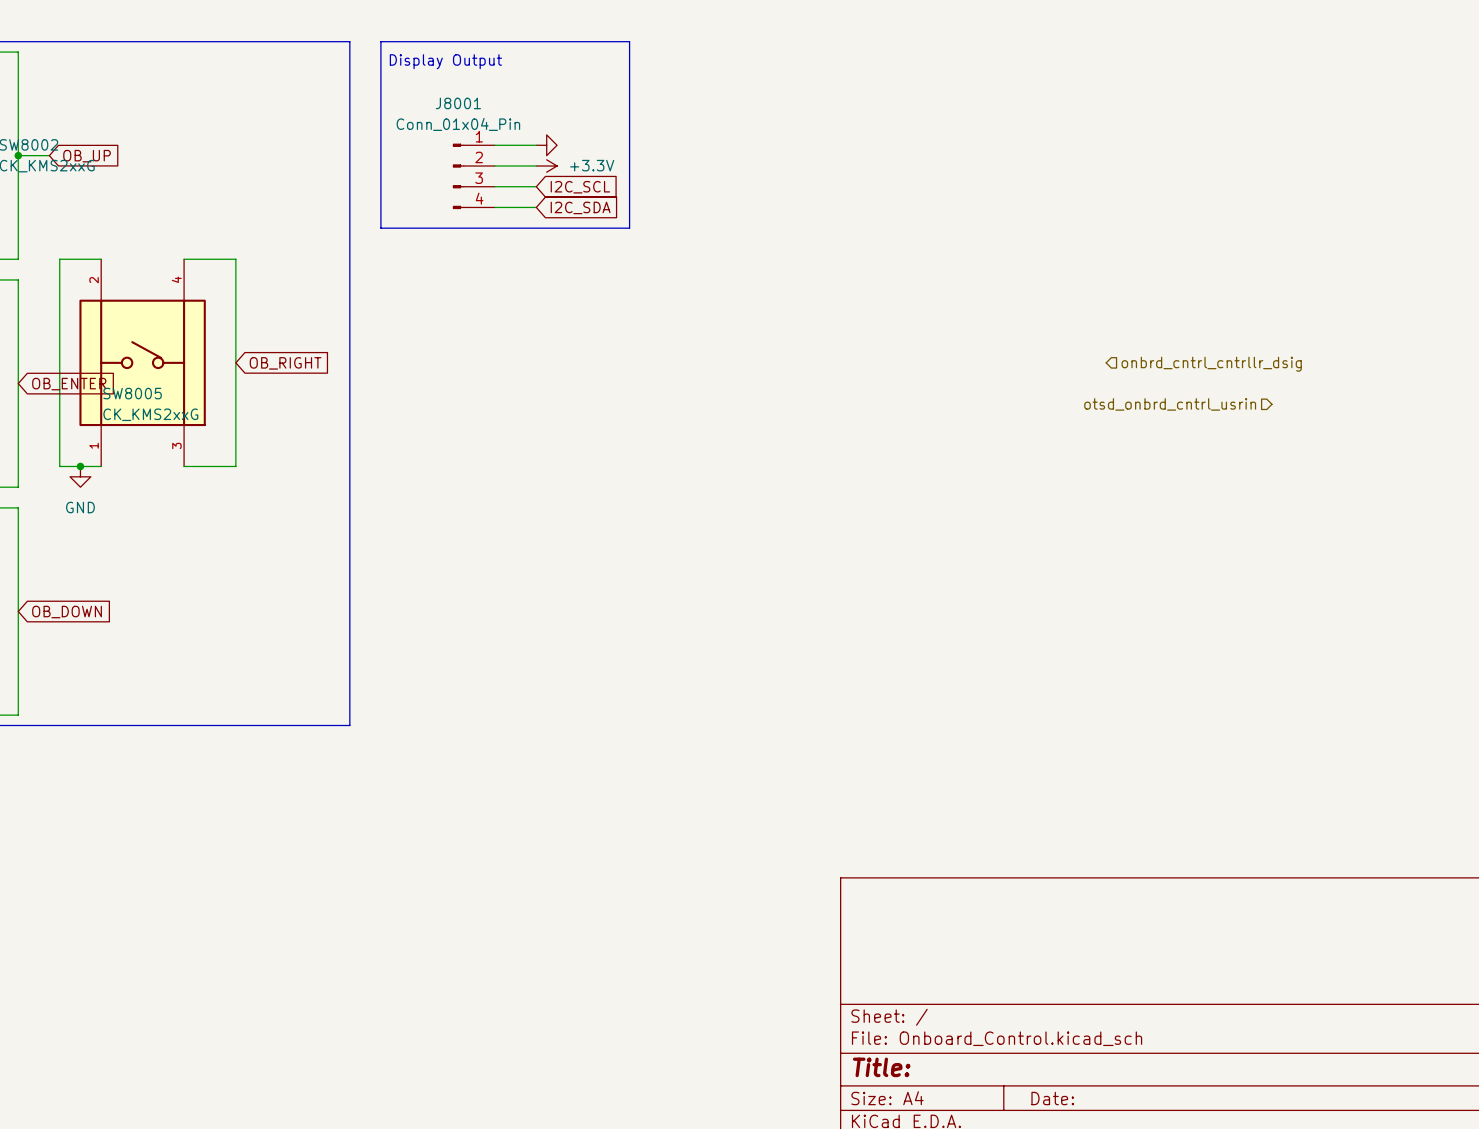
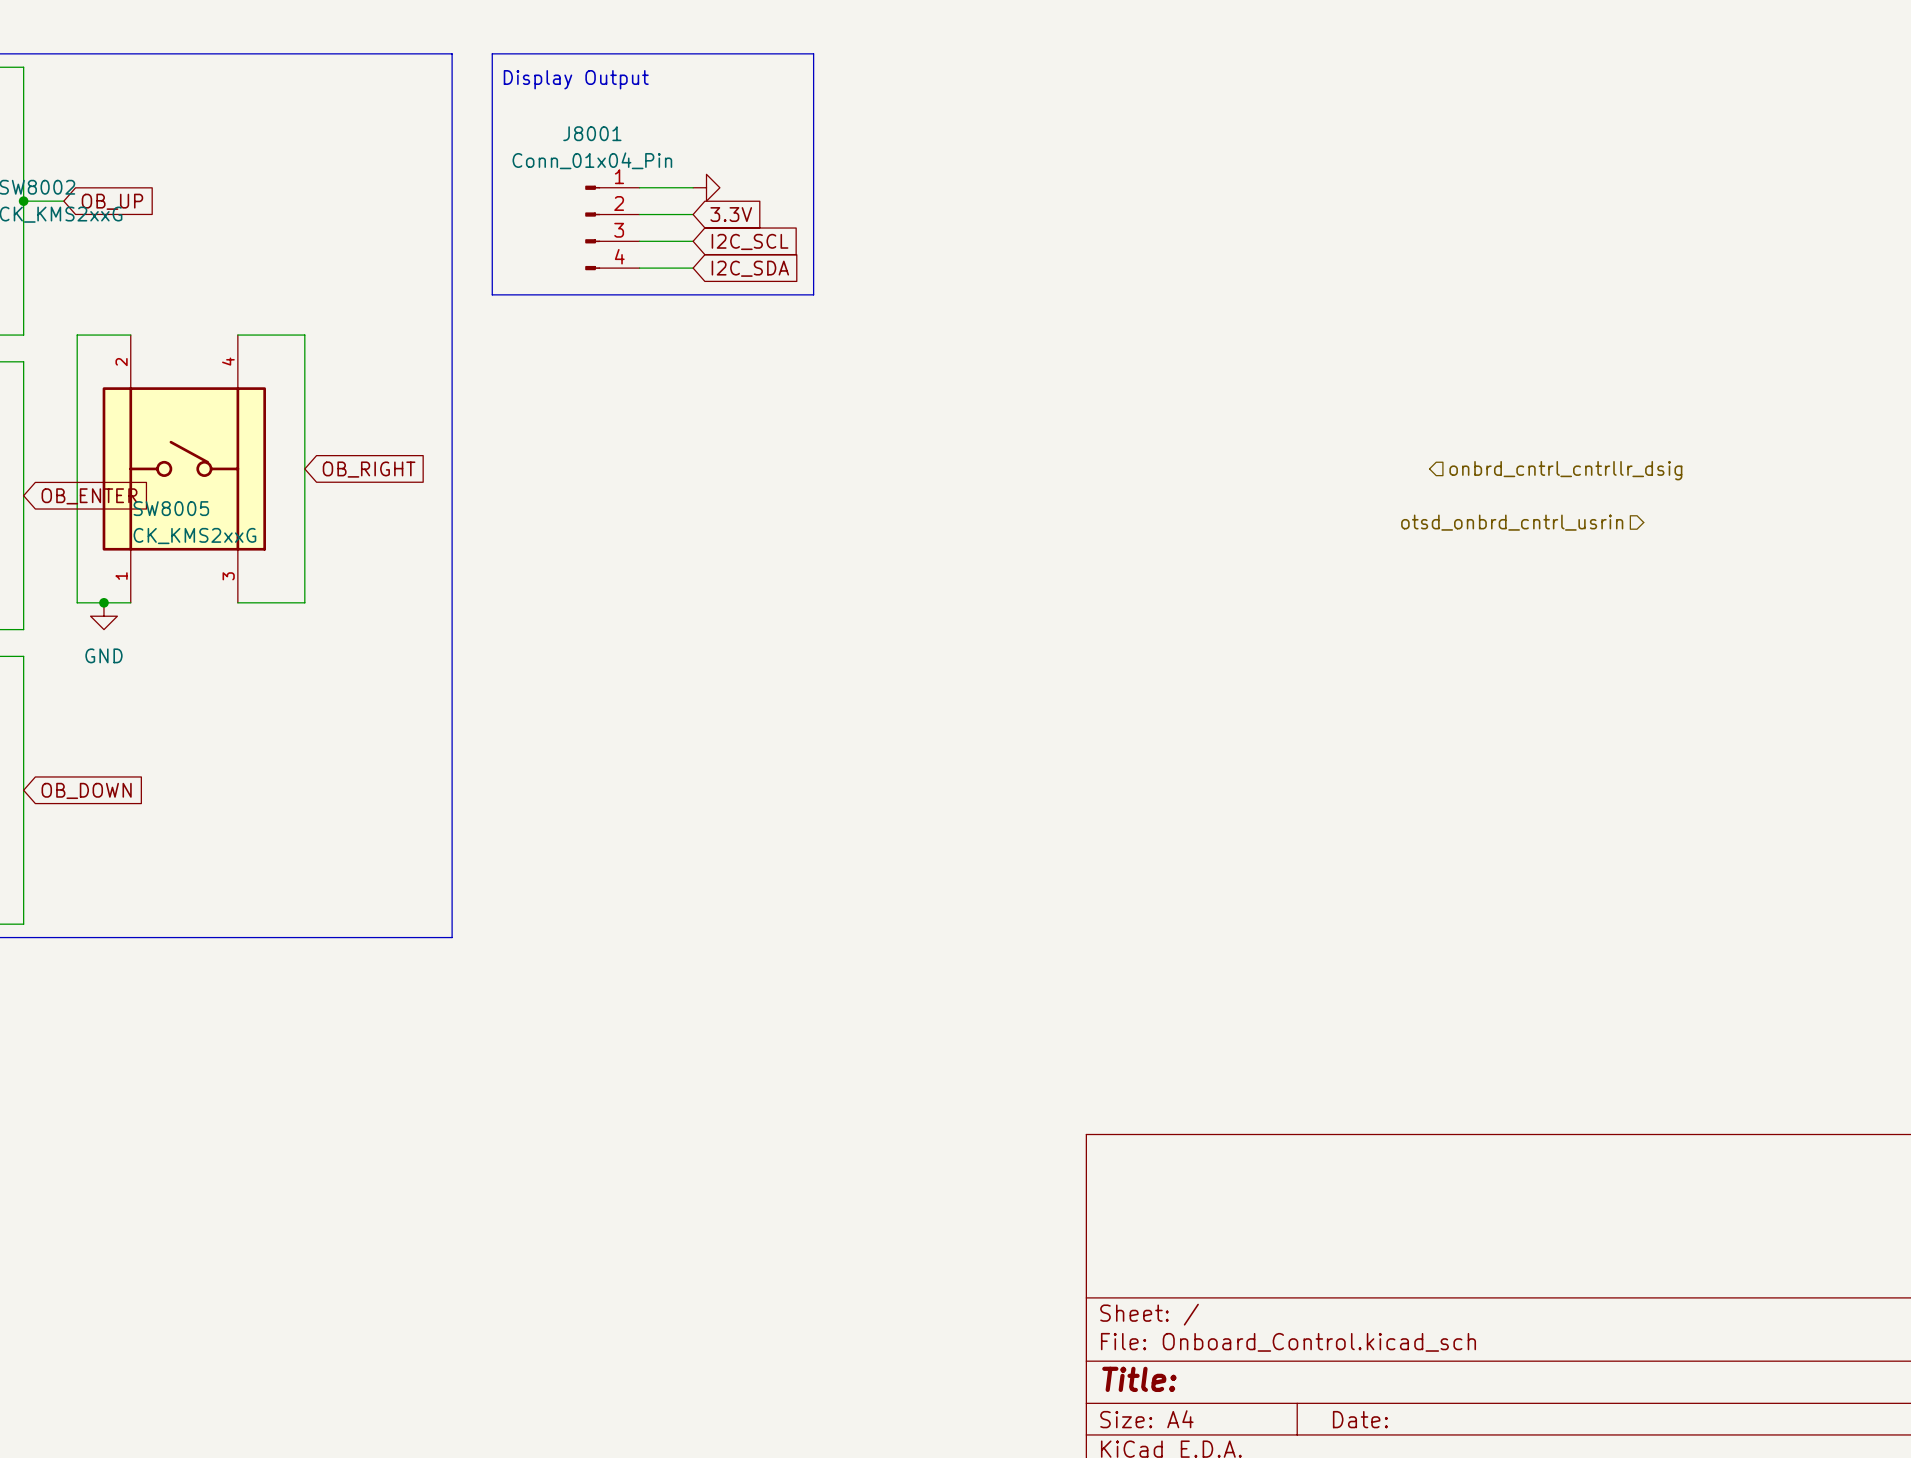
power symbol: +3.3V (546, 166) -> none
global label: none -> 3.3V (731, 214)

